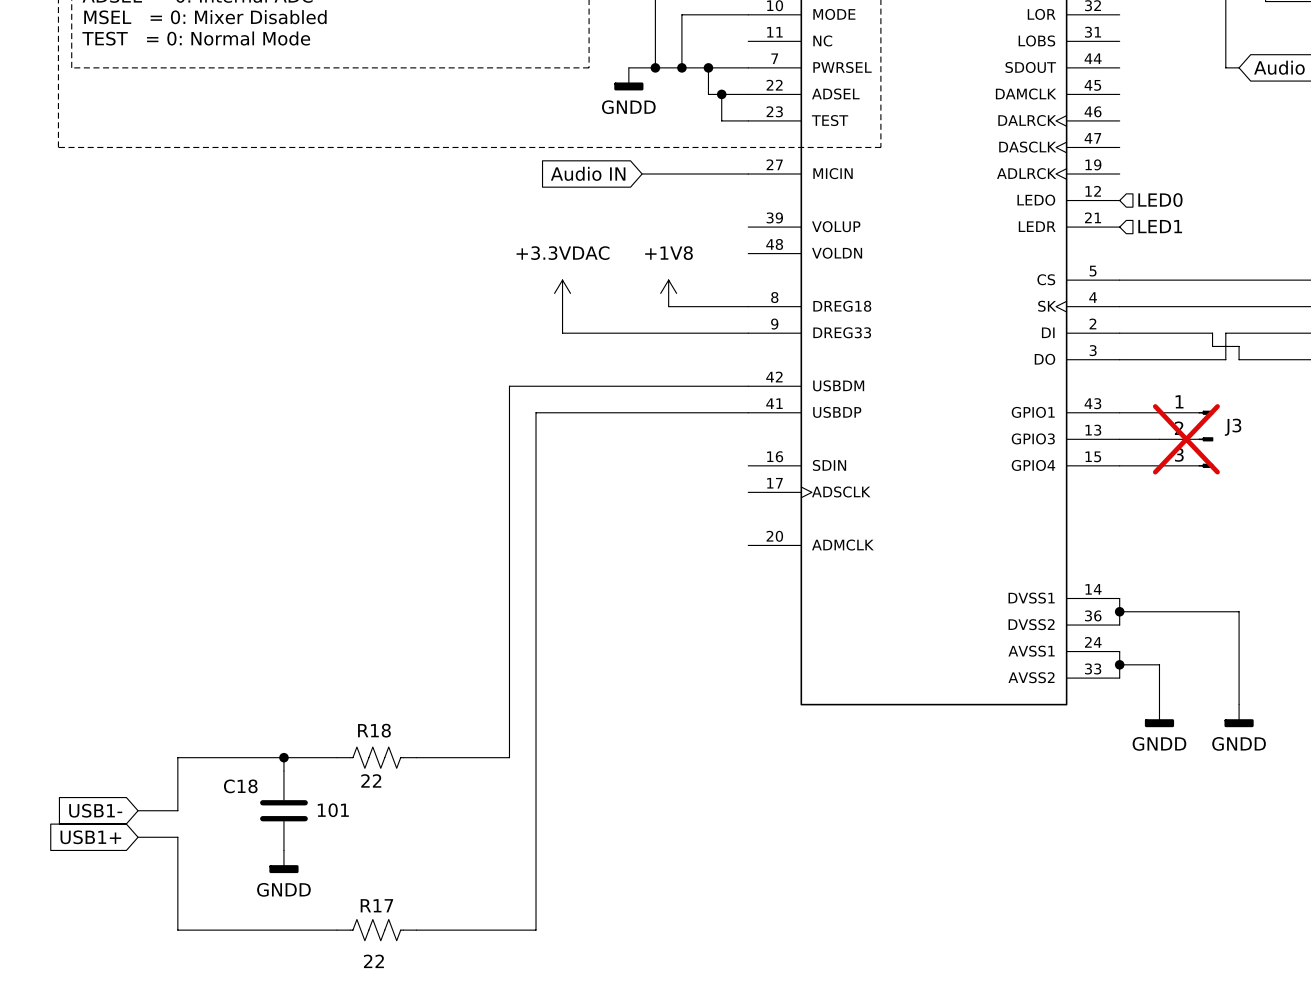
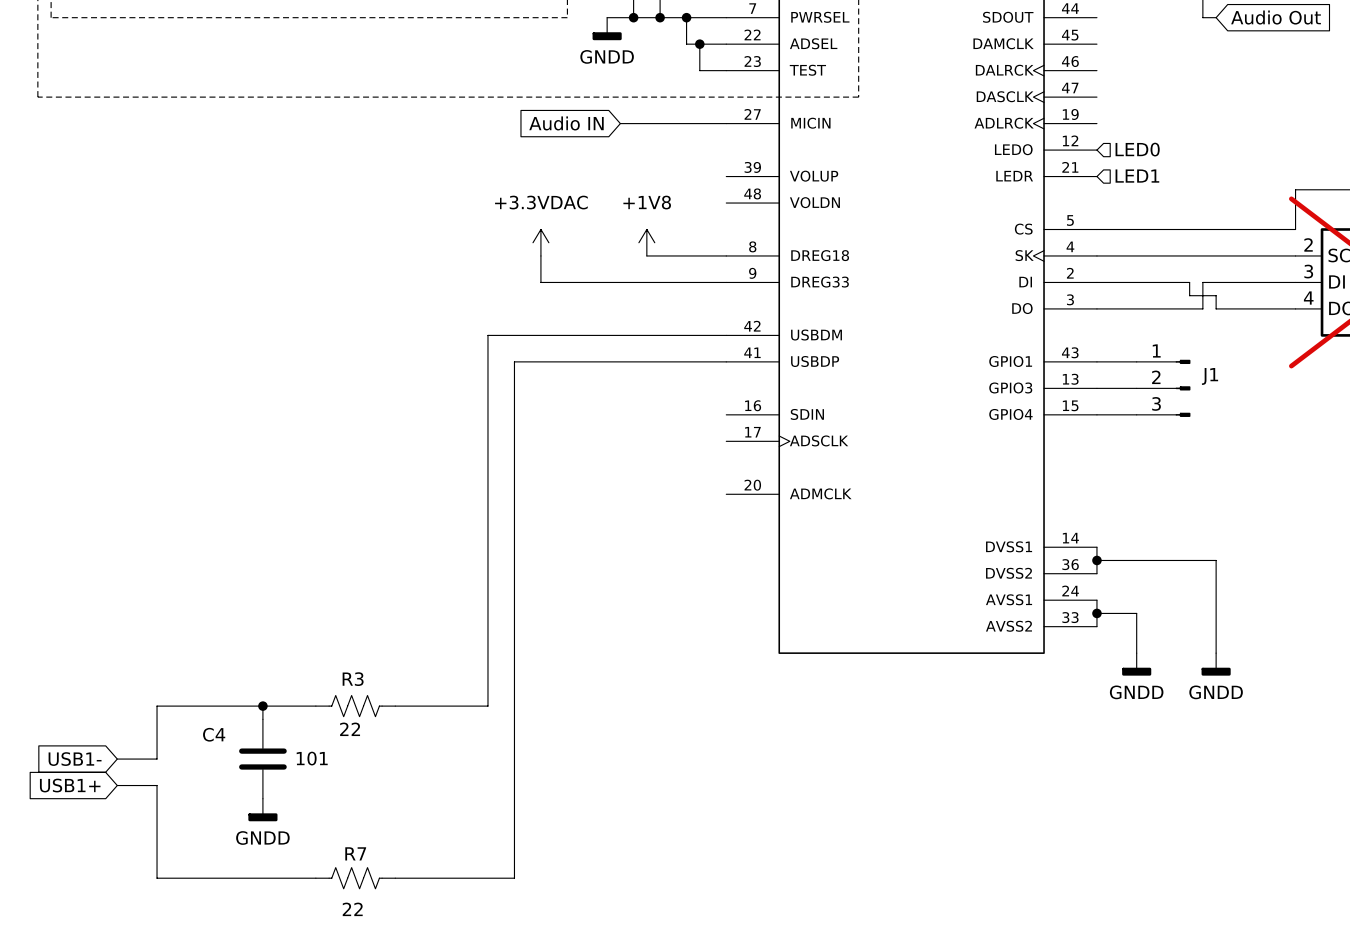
J3 name: J3 (1233, 427) -> J1 (1210, 376)
J3 do-not-place cross: (1186, 439) -> none
R18 name: R18 (374, 730) -> R3 (353, 679)
C18 name: C18 (240, 786) -> C4 (214, 734)
R17 name: R17 (376, 905) -> R7 (355, 853)

